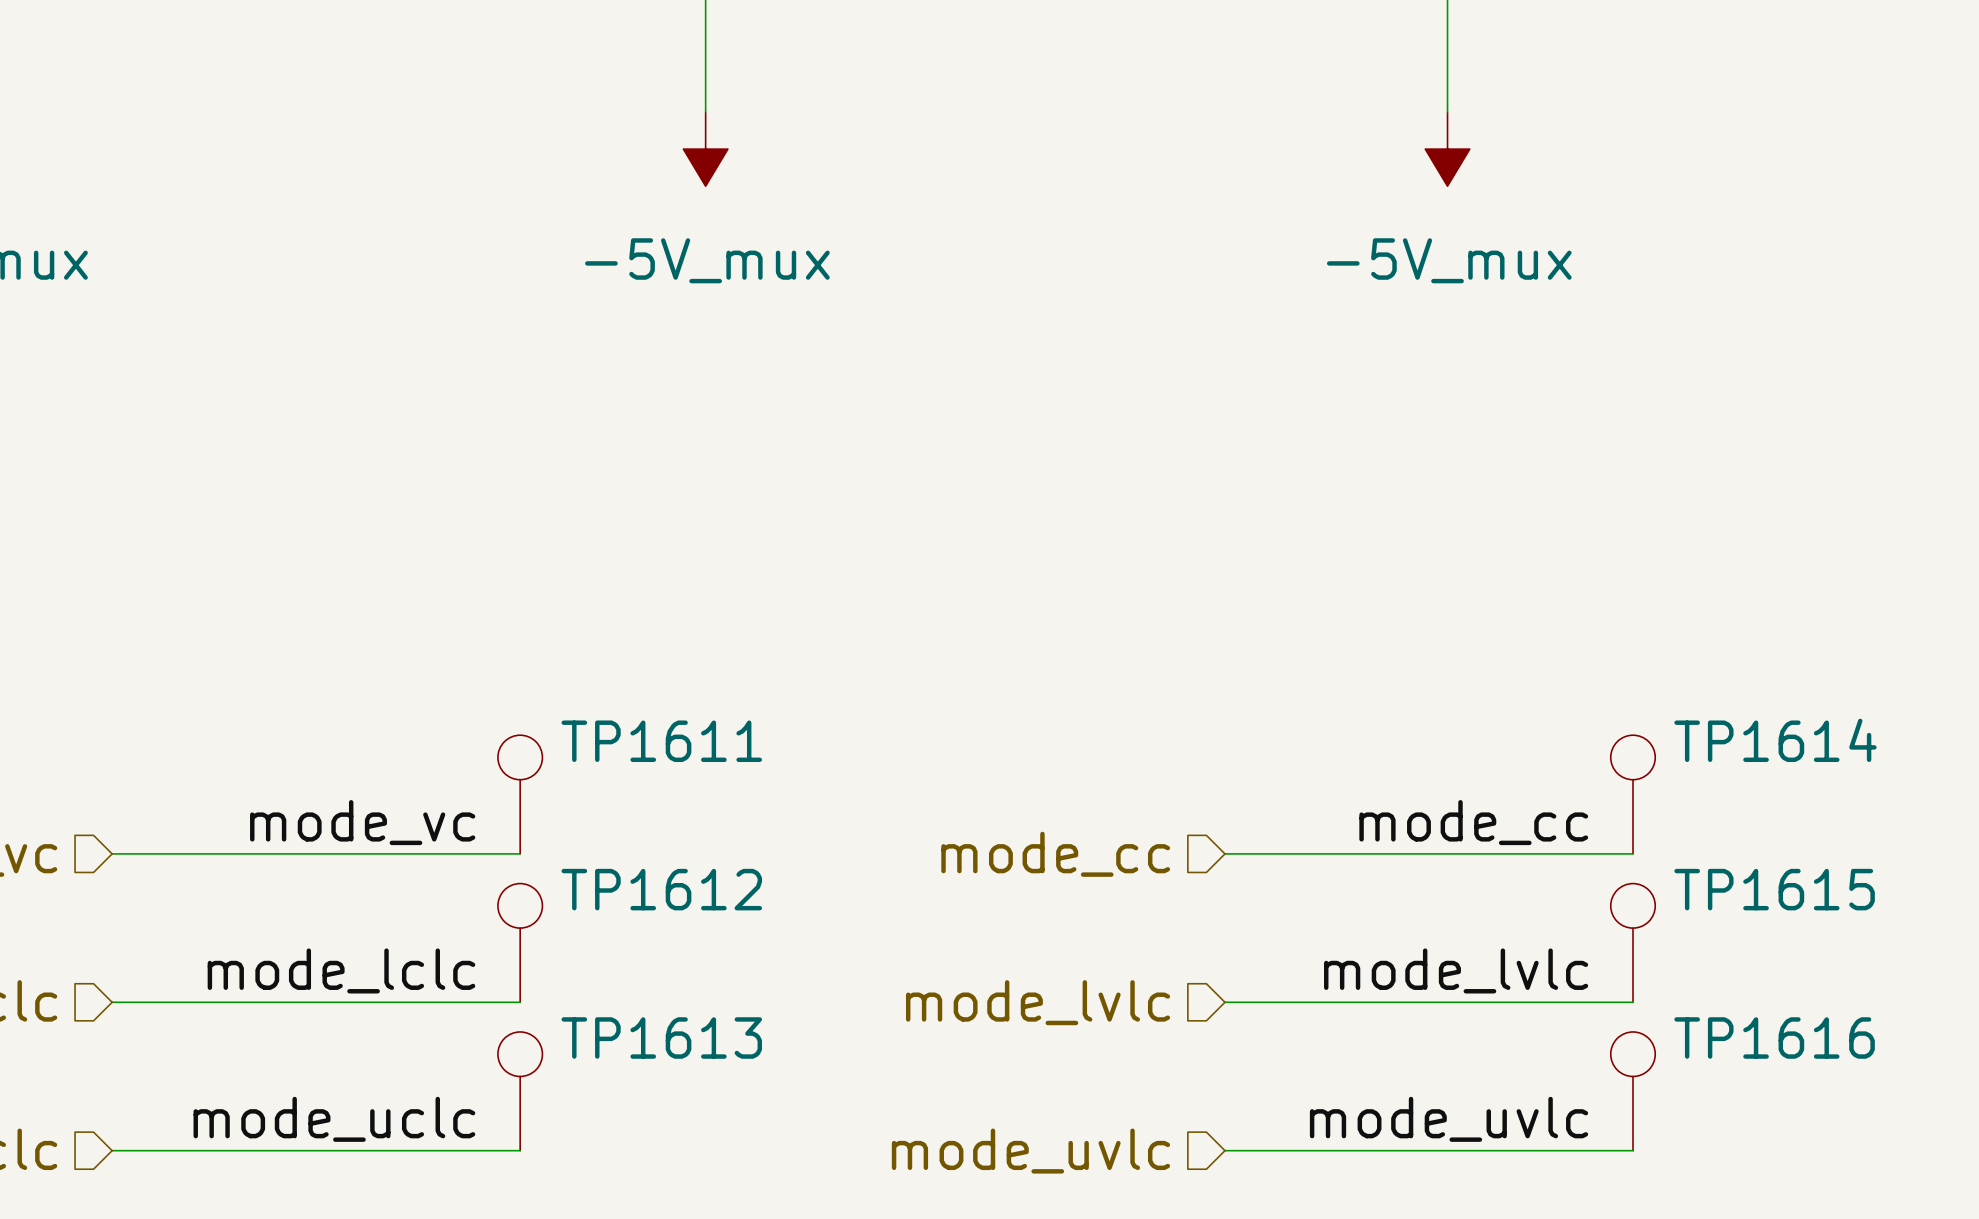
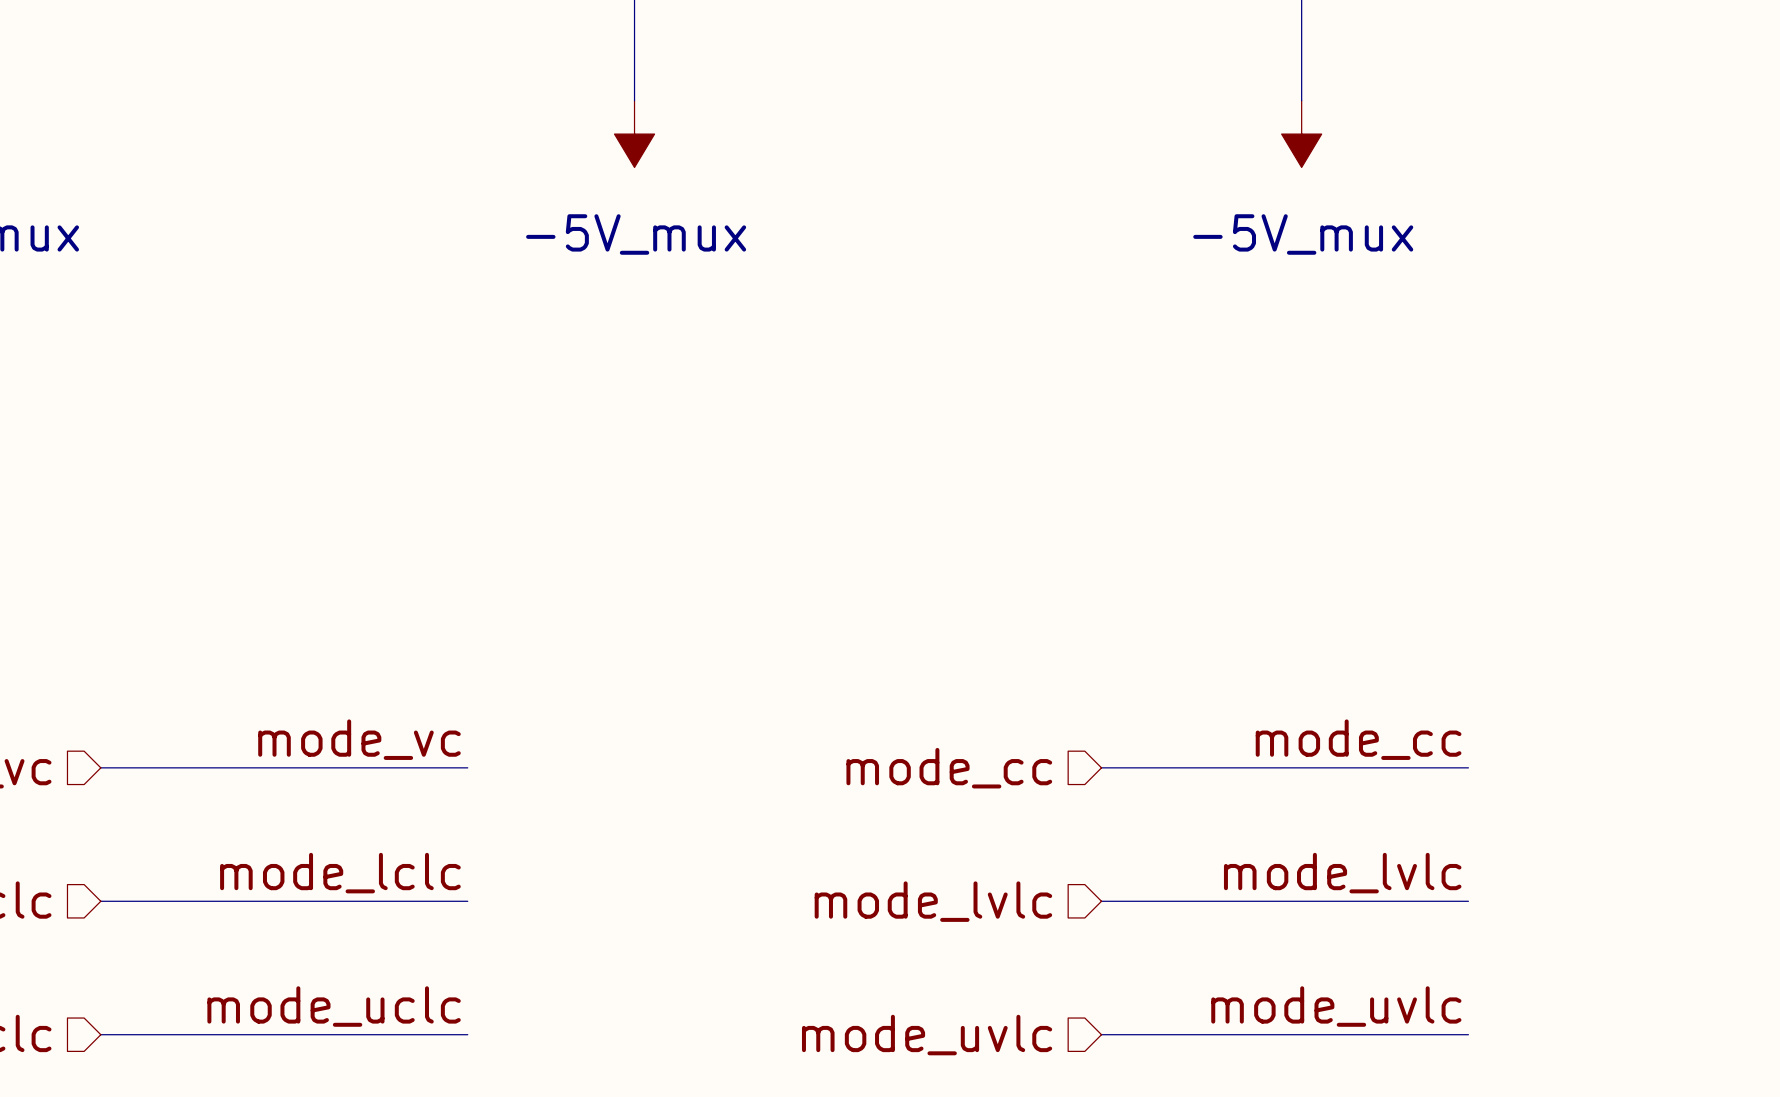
TP1611: (520, 794) -> none
TP1614: (1633, 794) -> none
label position: mode_vc (362, 822) -> mode_vc (359, 739)
label position: mode_cc (1473, 822) -> mode_cc (1358, 739)
TP1612: (520, 942) -> none
TP1615: (1633, 942) -> none
label position: mode_lclc (341, 970) -> mode_lclc (340, 873)
label position: mode_lvlc (1456, 970) -> mode_lvlc (1342, 873)
TP1613: (520, 1091) -> none
TP1616: (1633, 1091) -> none
label position: mode_uclc (334, 1119) -> mode_uclc (334, 1006)
label position: mode_uvlc (1449, 1119) -> mode_uvlc (1336, 1006)

